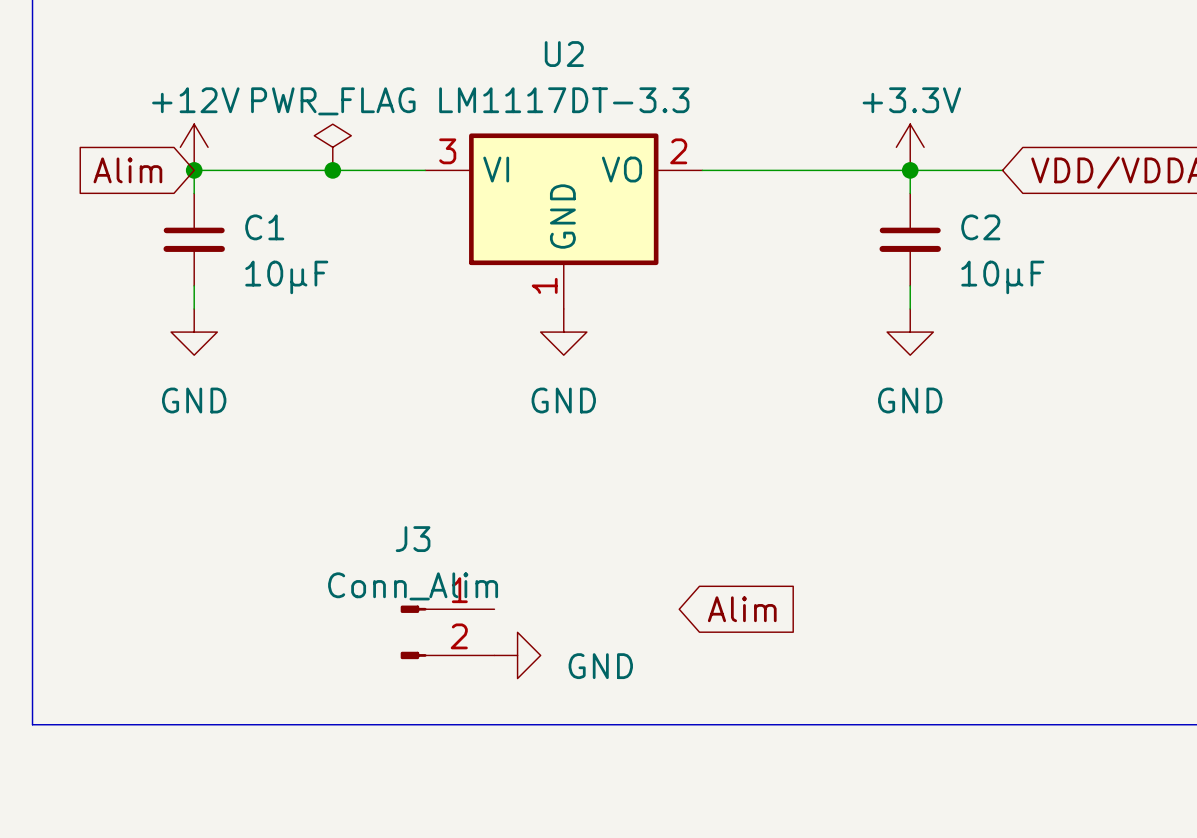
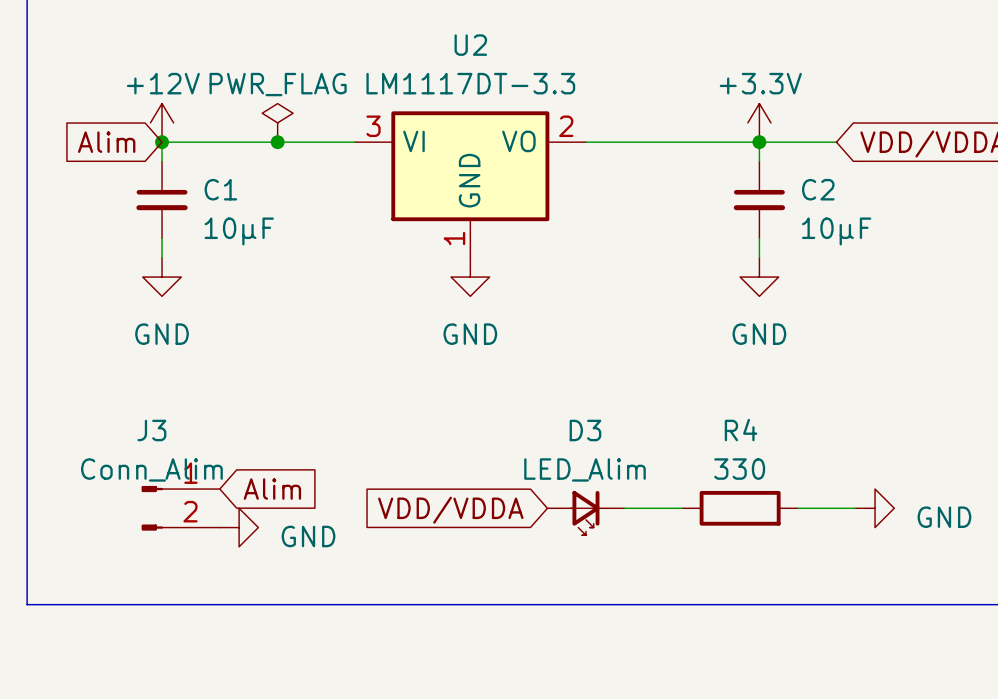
global label position: Alim (742, 609) -> Alim (272, 489)
wire: none -> (624, 508) (682, 508)
R4: none -> 330 (740, 508)
wire: none -> (797, 508) (855, 508)
power symbol: none -> GND (875, 508)
global label: none -> VDD/VDDA (450, 510)
D3: none -> LED_Alim (585, 513)
J3 position: (447, 632) -> (180, 508)
power symbol position: GND (517, 655) -> GND (239, 527)

